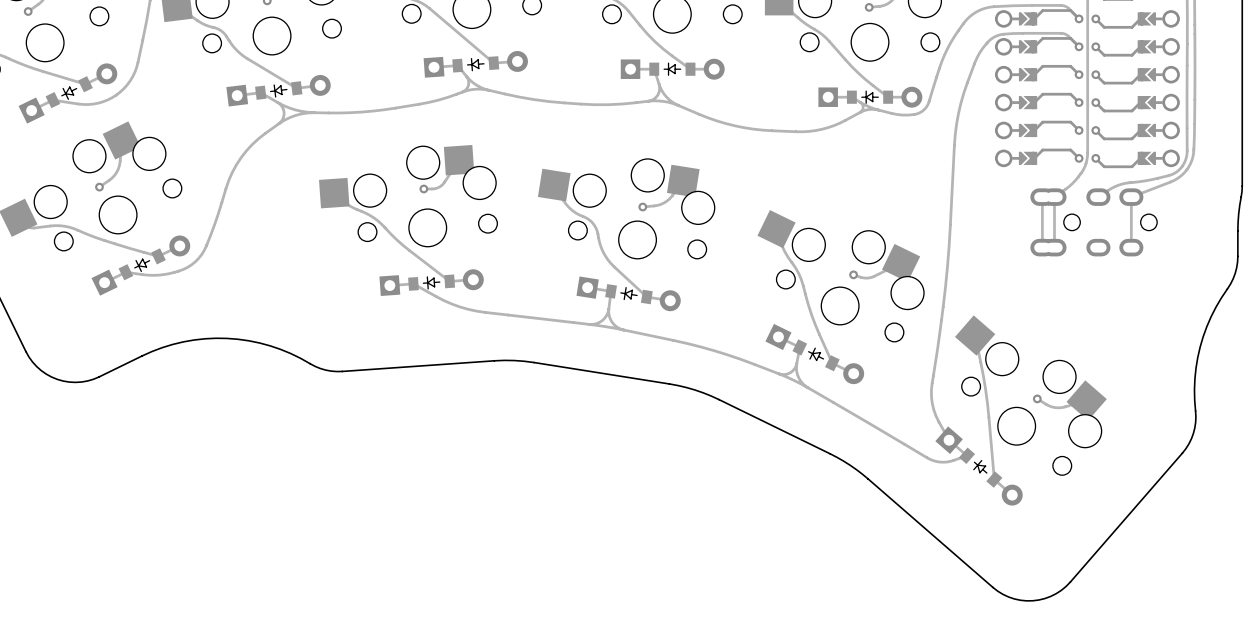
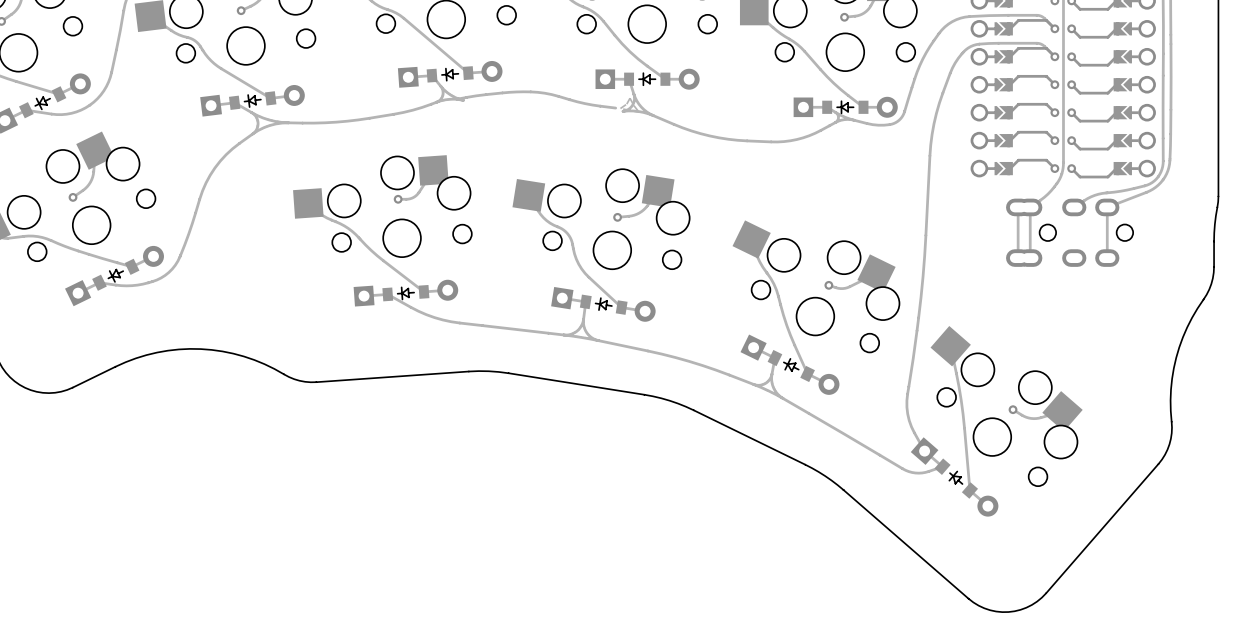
zone outline: none -> (630, 98) (633, 105) (639, 112) (620, 108) (626, 104) (630, 98)
track: none -> (457, 99) (502, 92) (530, 91) (615, 108)
track: (488, 90) (534, 99) (580, 104) (608, 104) (648, 101) -> none

